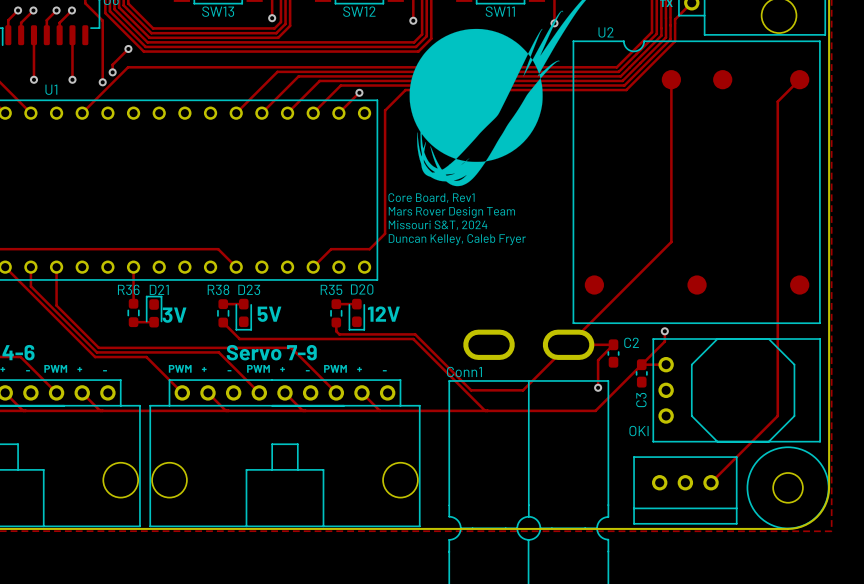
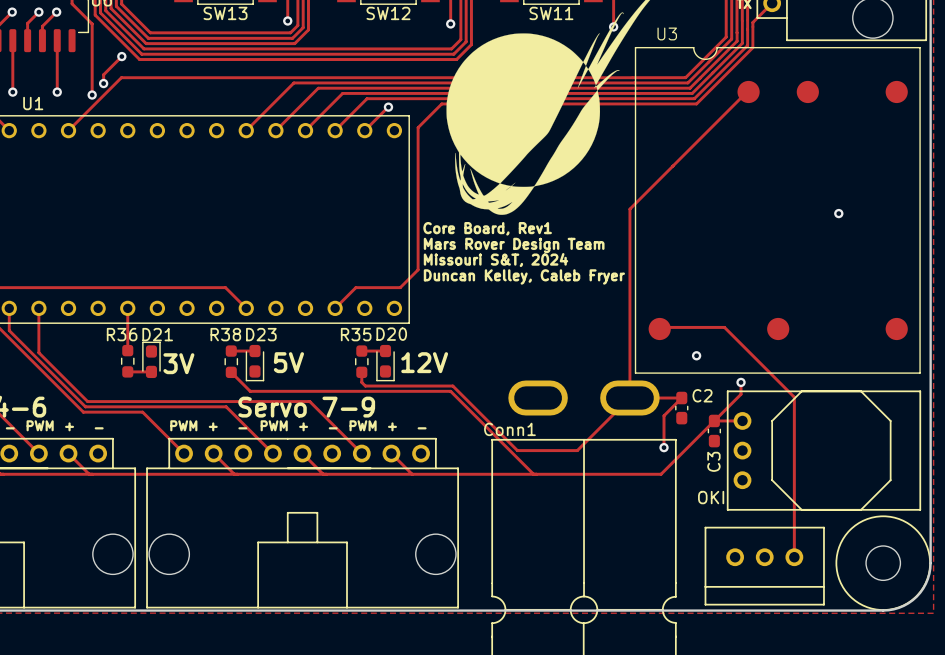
U2 name: U2 (606, 32) -> U3 (667, 33)
track: (671, 79) (671, 242) (568, 344) -> (748, 90) (629, 209) (629, 398)
track: (799, 79) (777, 101) (777, 416) (711, 482) -> (659, 327) (724, 327) (794, 397) (794, 557)
via: none -> (838, 213)
via: none -> (696, 355)

